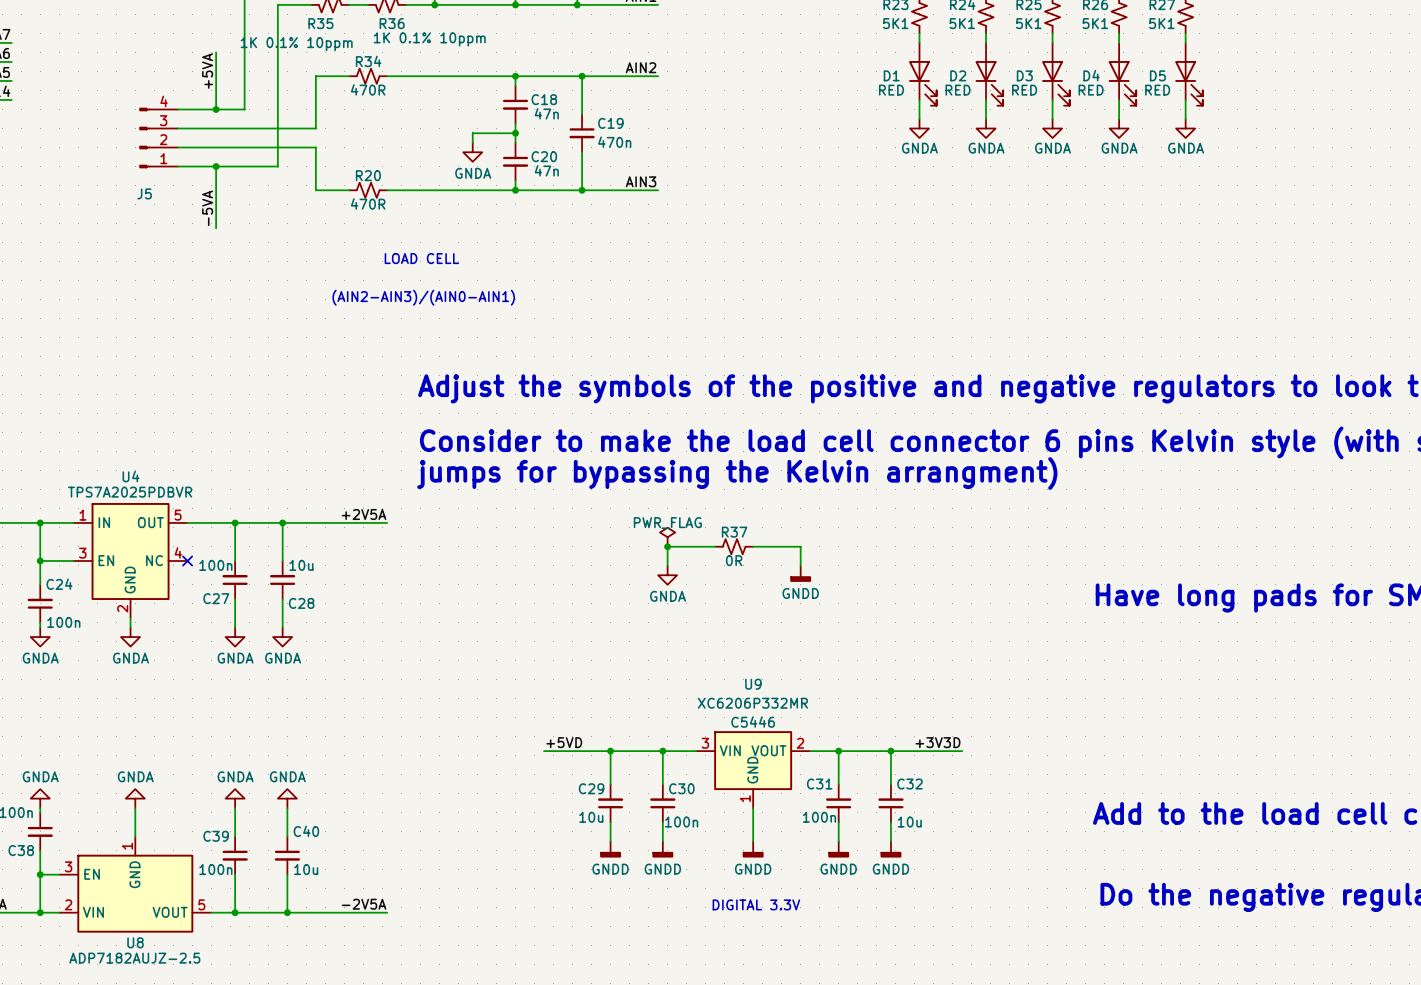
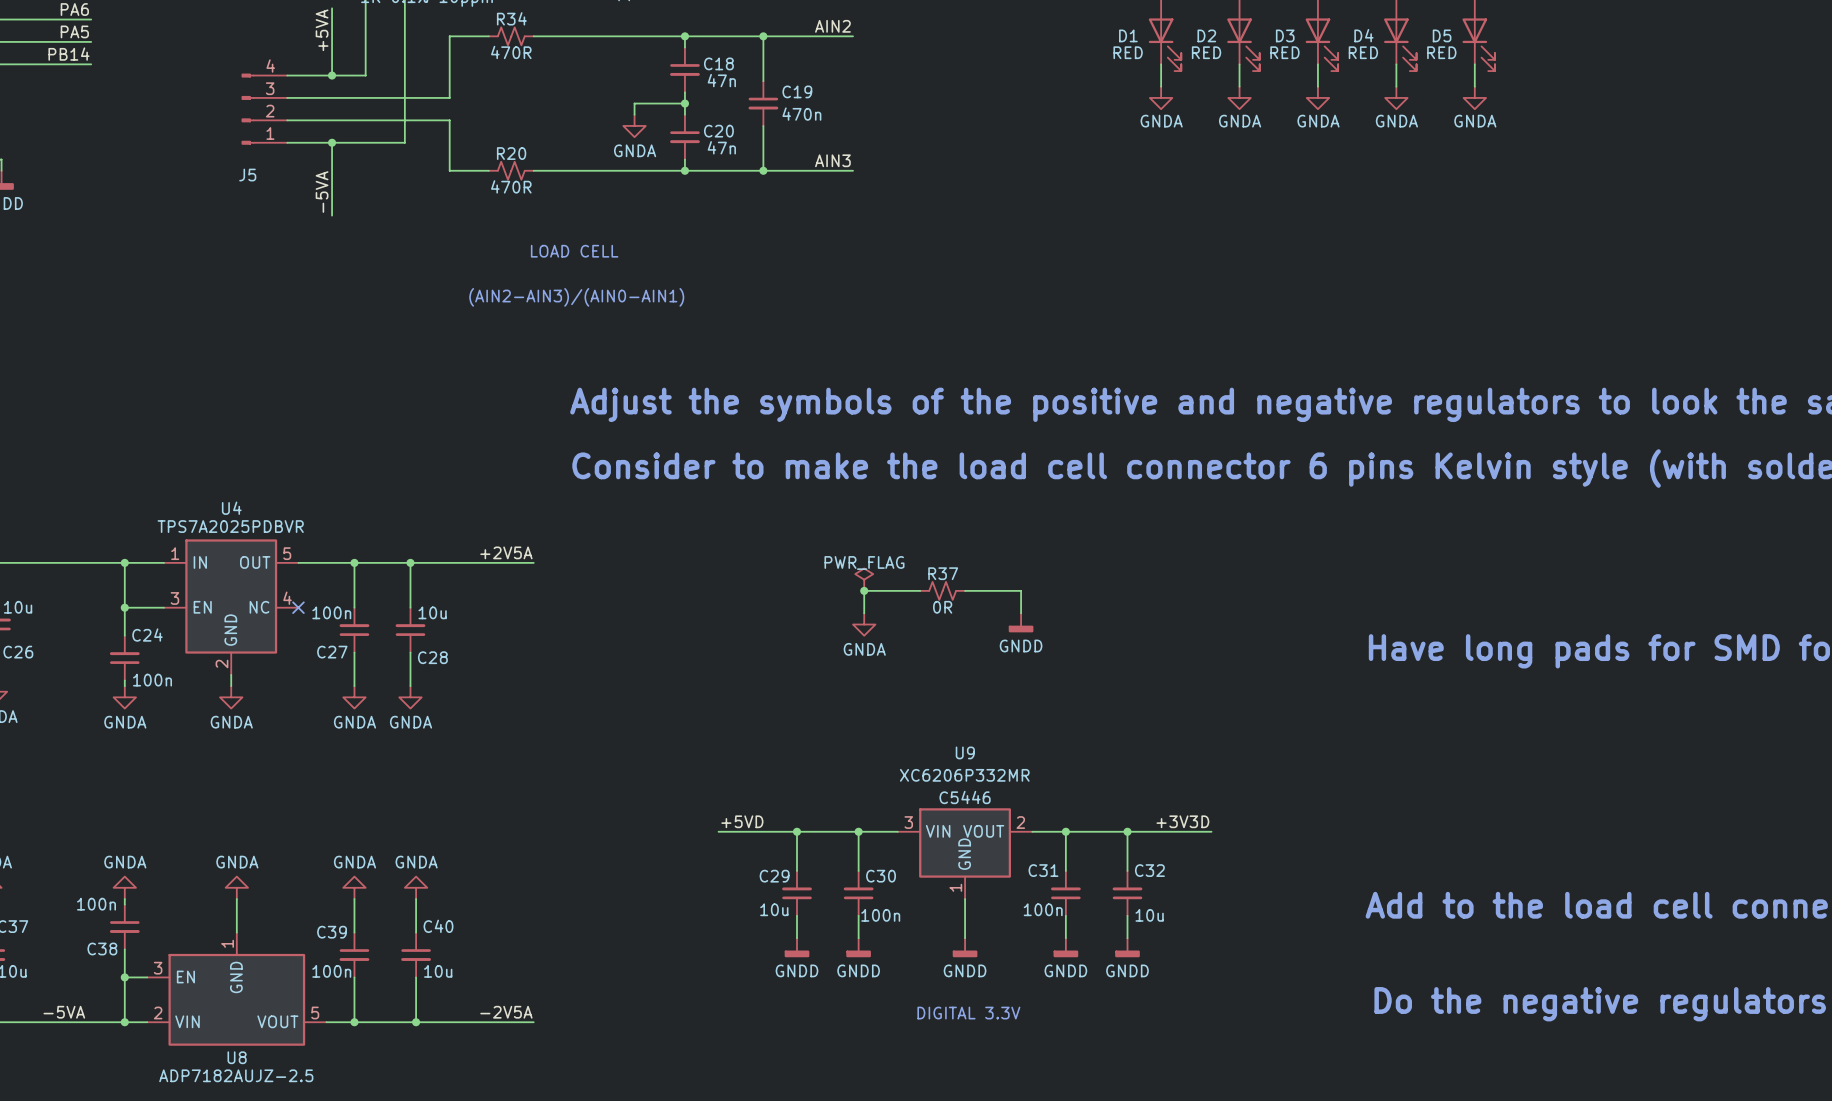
text: jumps for bypassing the Kelvin arrangment) (737, 473) -> none

